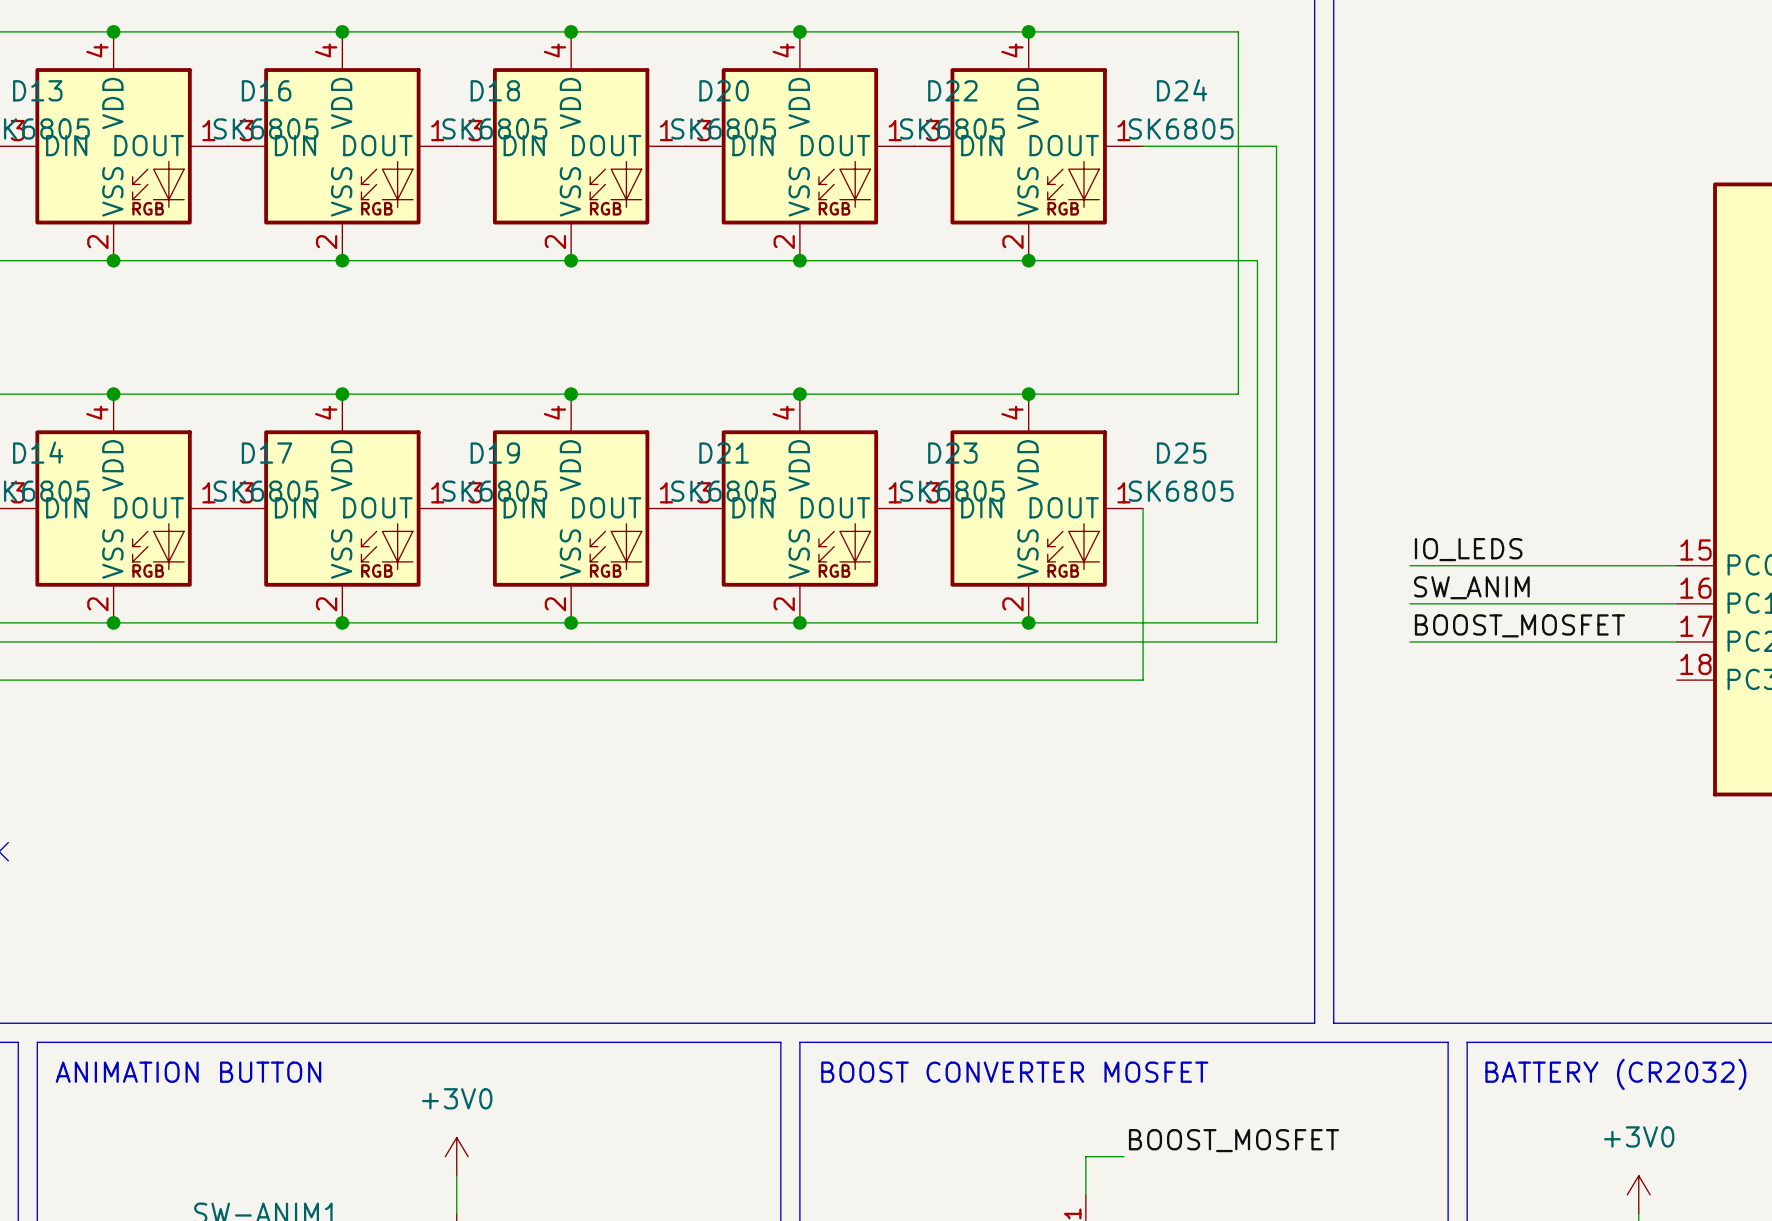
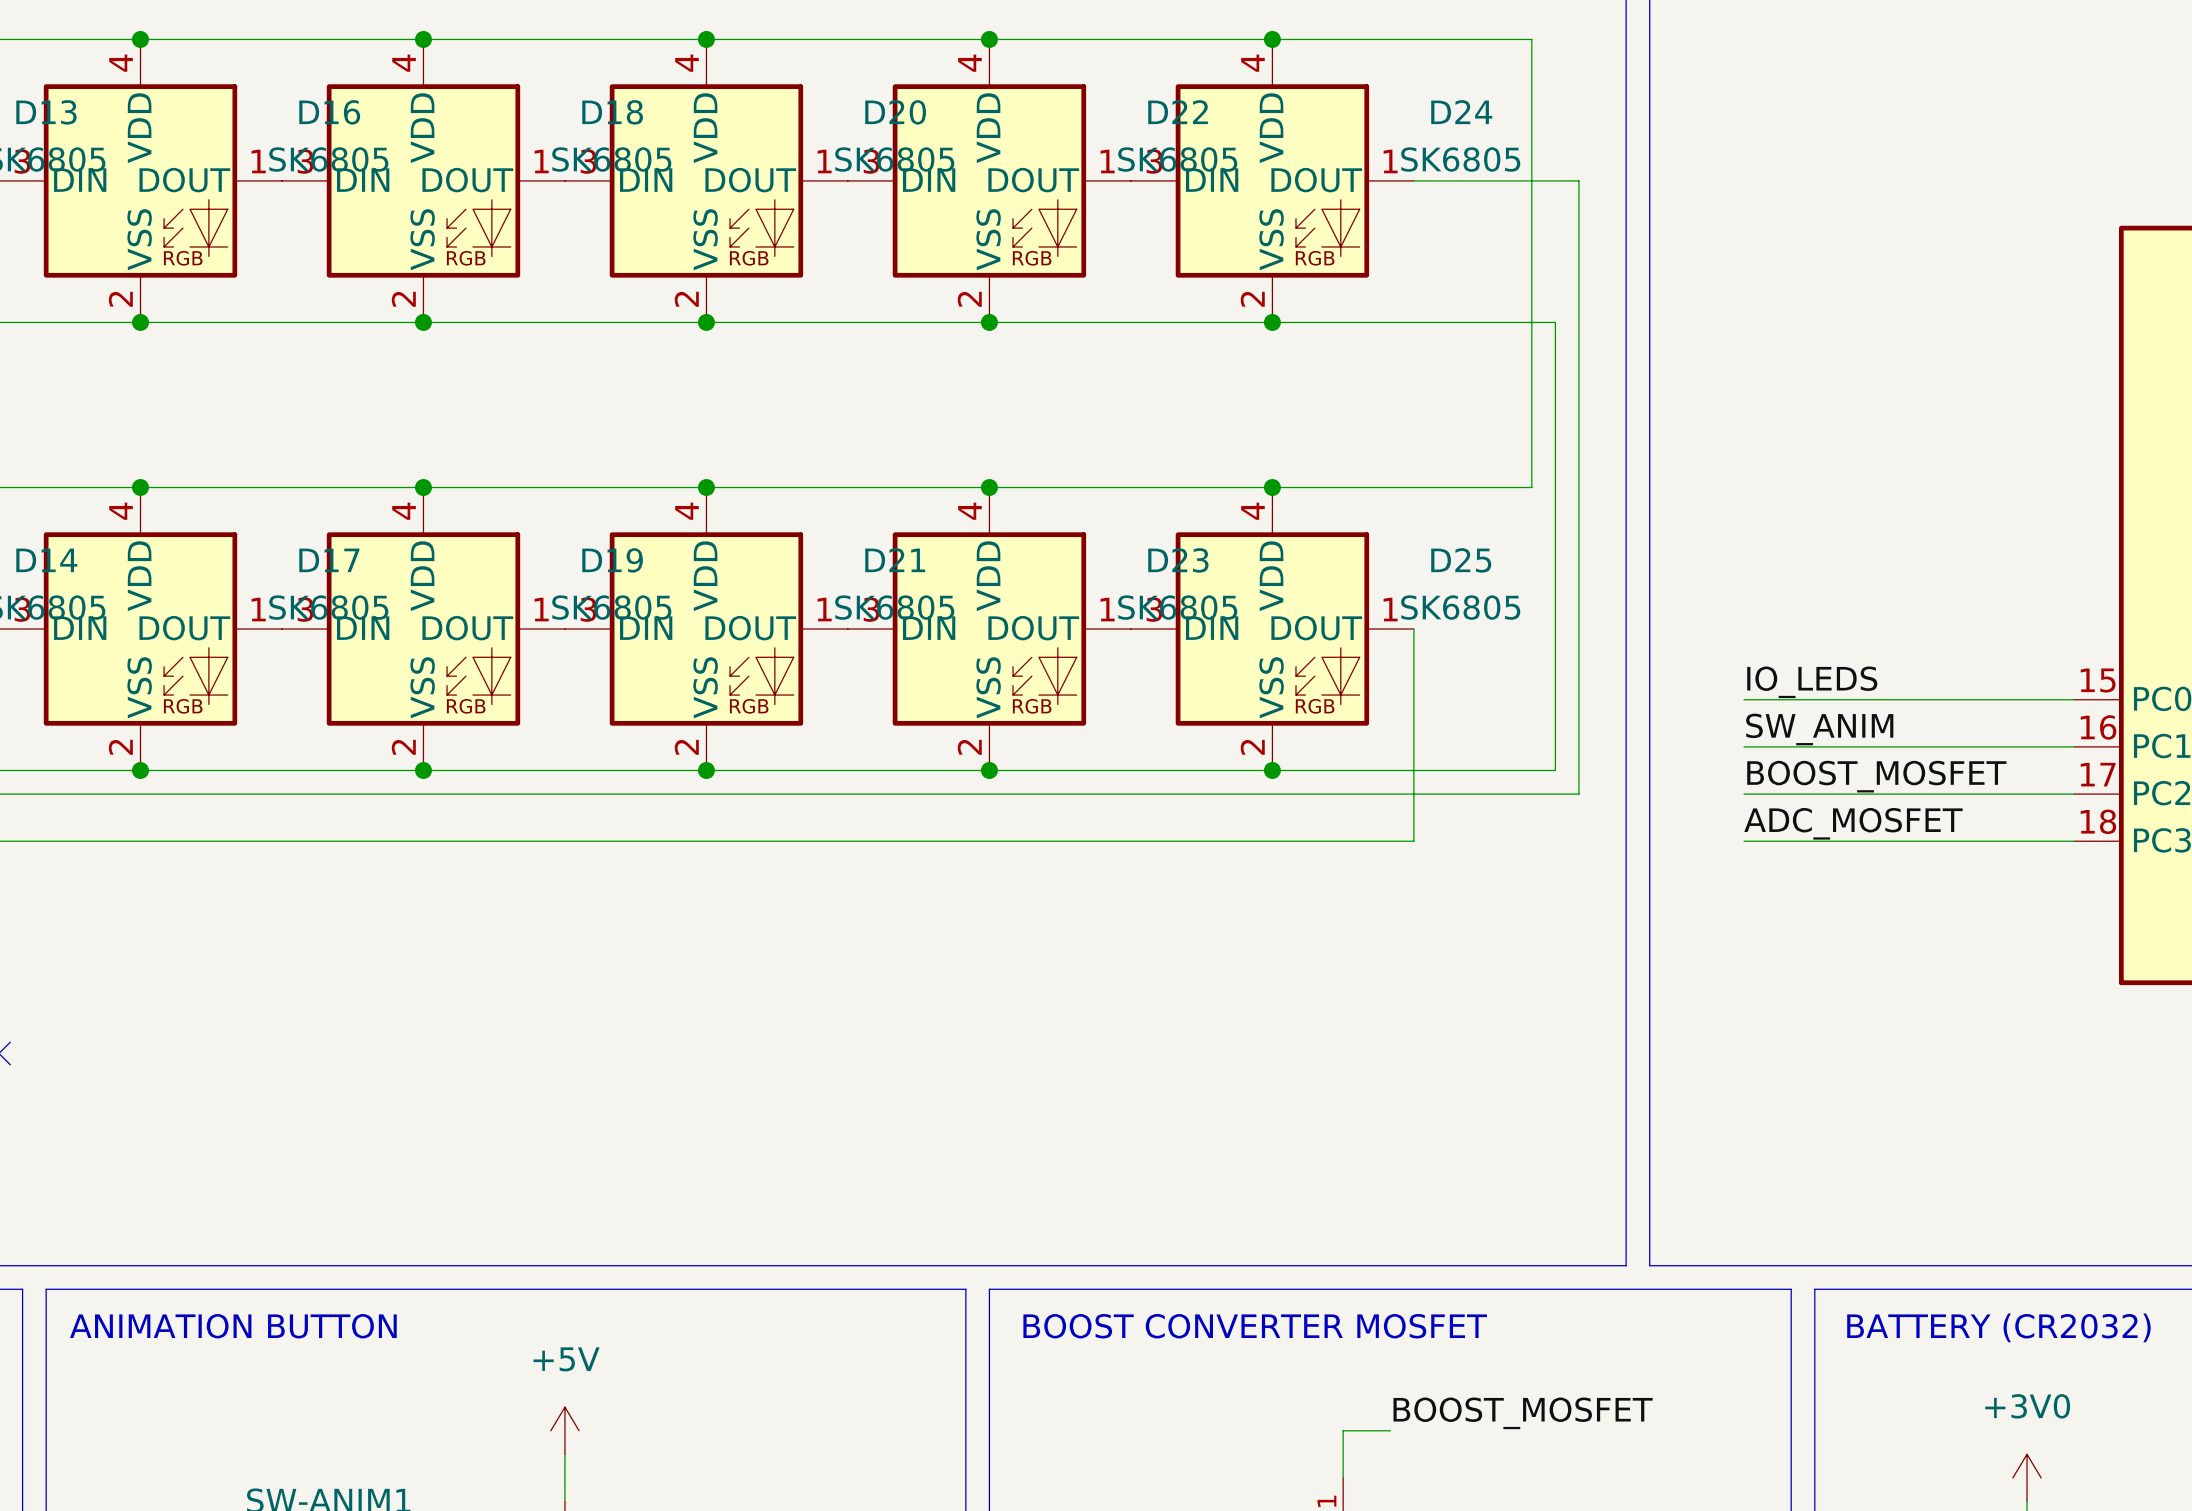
label: none -> ADC_MOSFET (1853, 823)
wire: none -> (1744, 841) (2074, 841)
power symbol: +3V0 (456, 1156) -> +5V (564, 1430)

